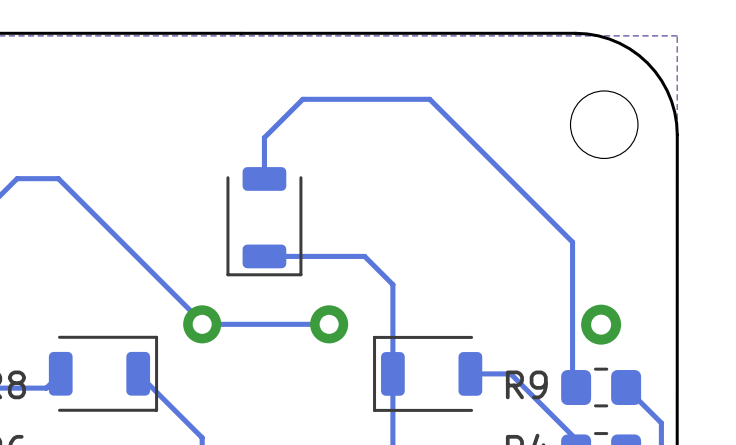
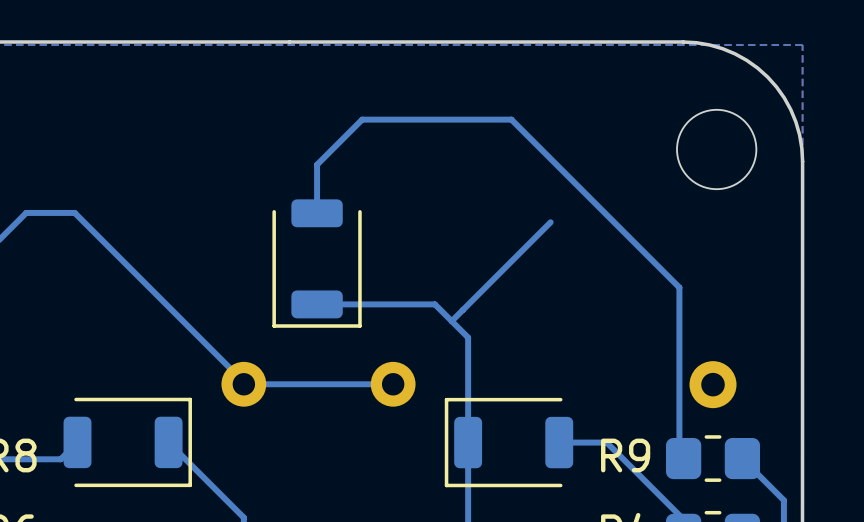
bottom track: none -> (550, 222) (451, 321)

